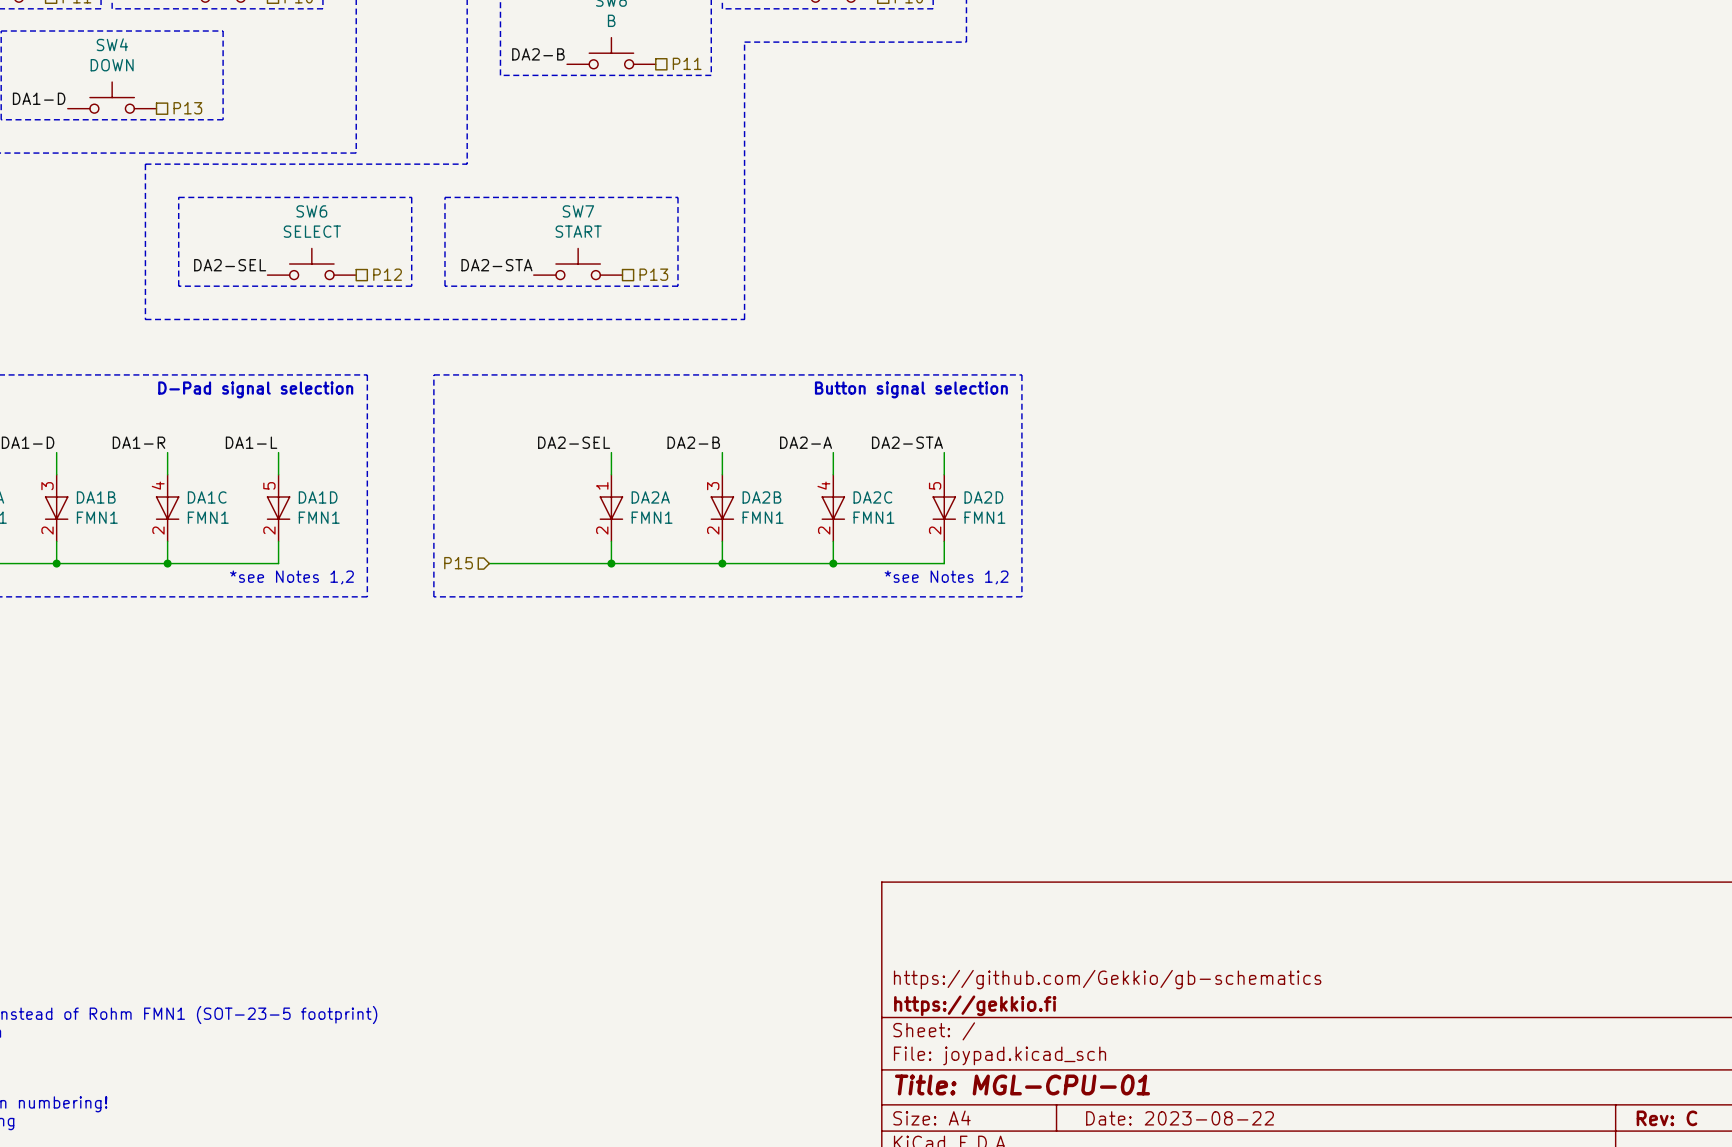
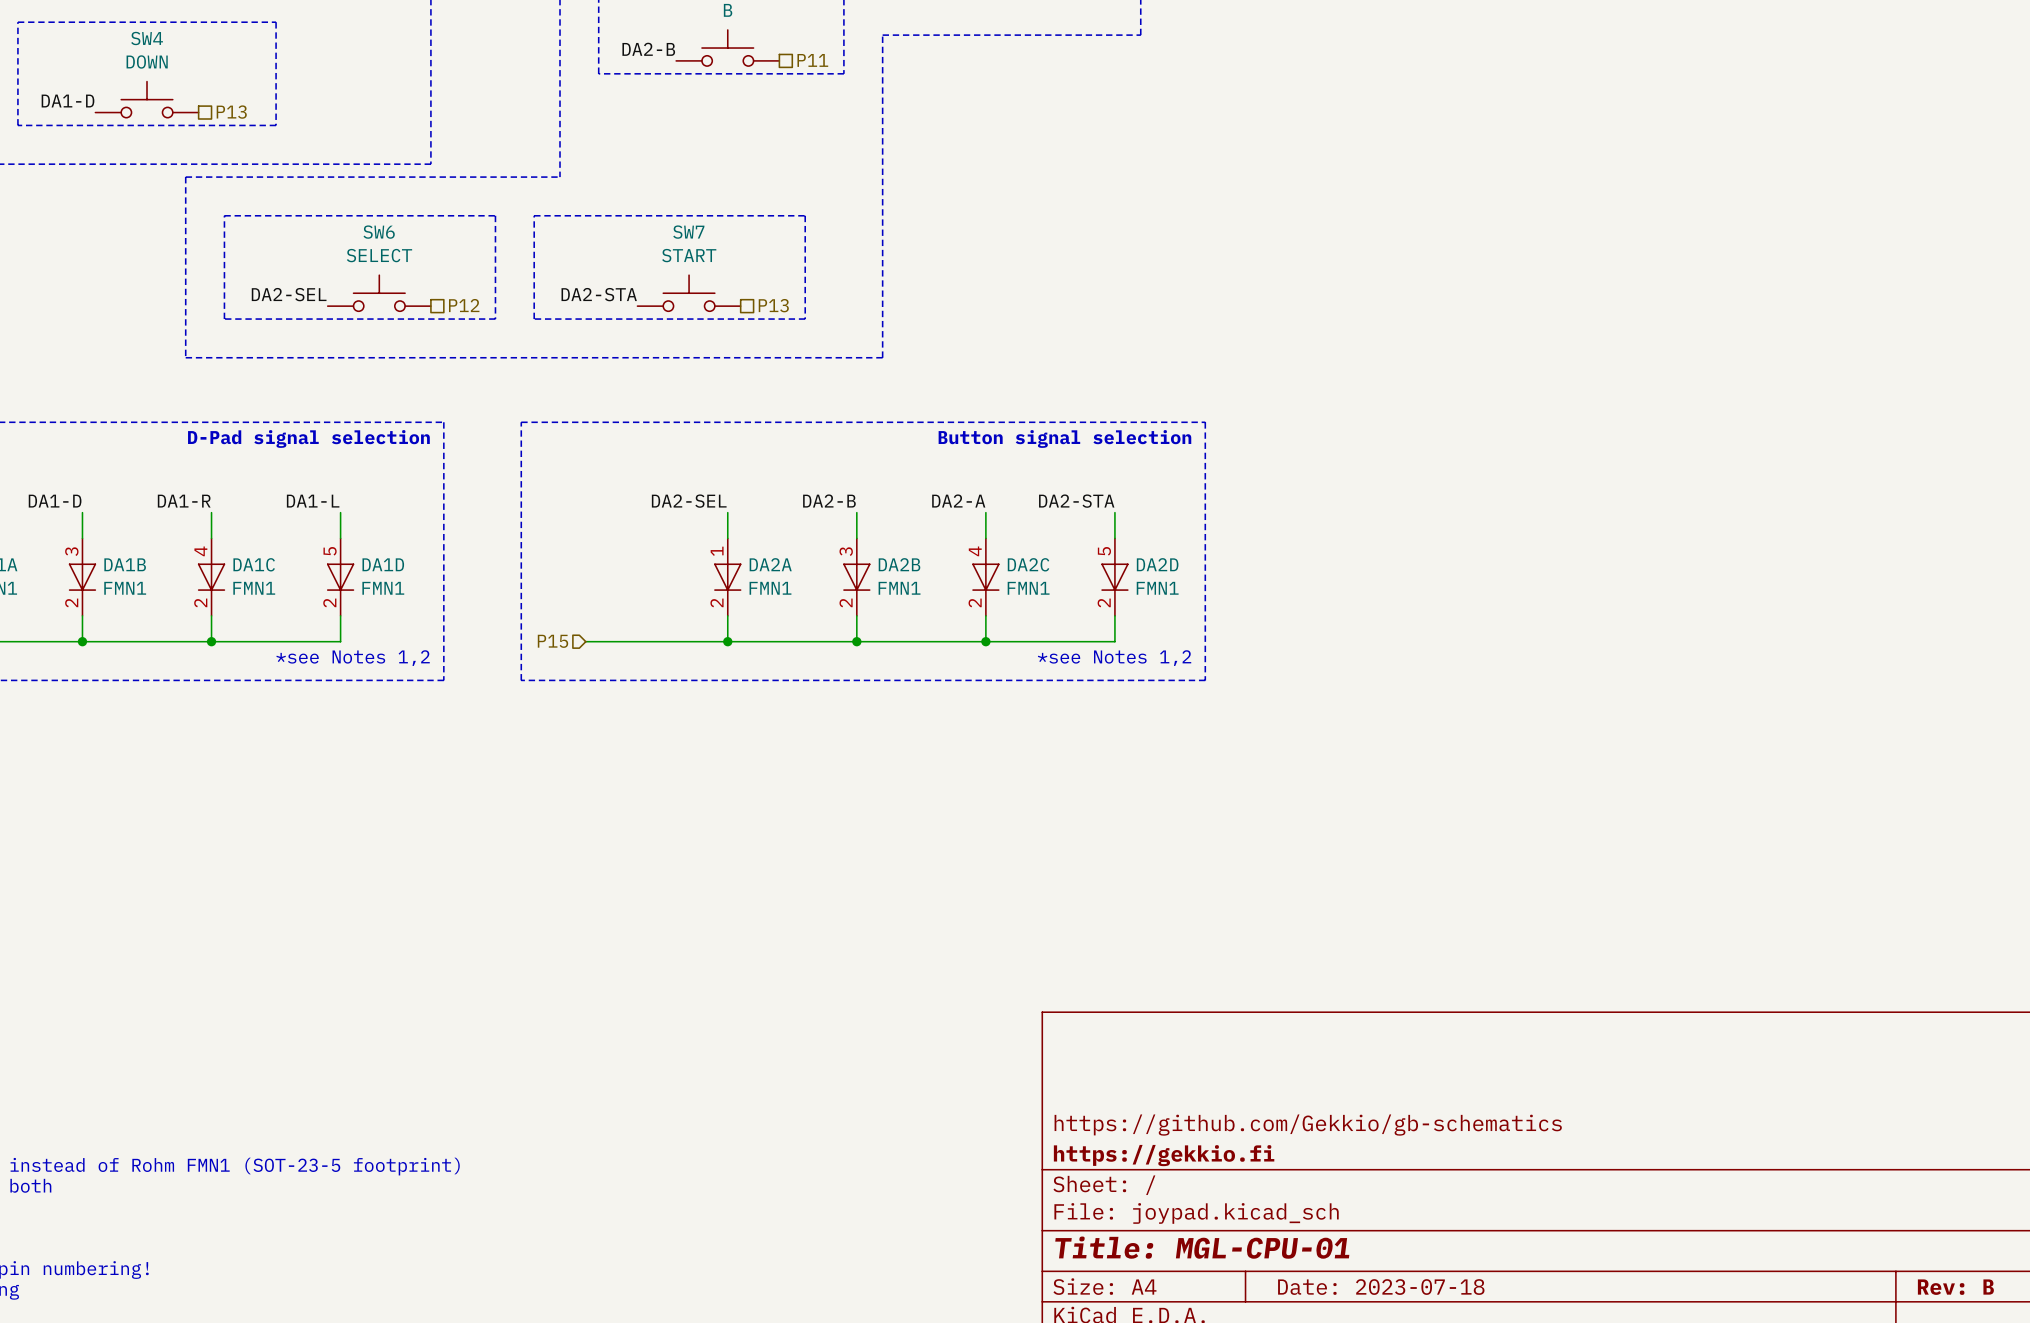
title block: Date: 2023-08-22 (1180, 1118) -> Date: 2023-07-18 (1381, 1287)
title block: Rev: C (1666, 1118) -> Rev: B (1955, 1287)

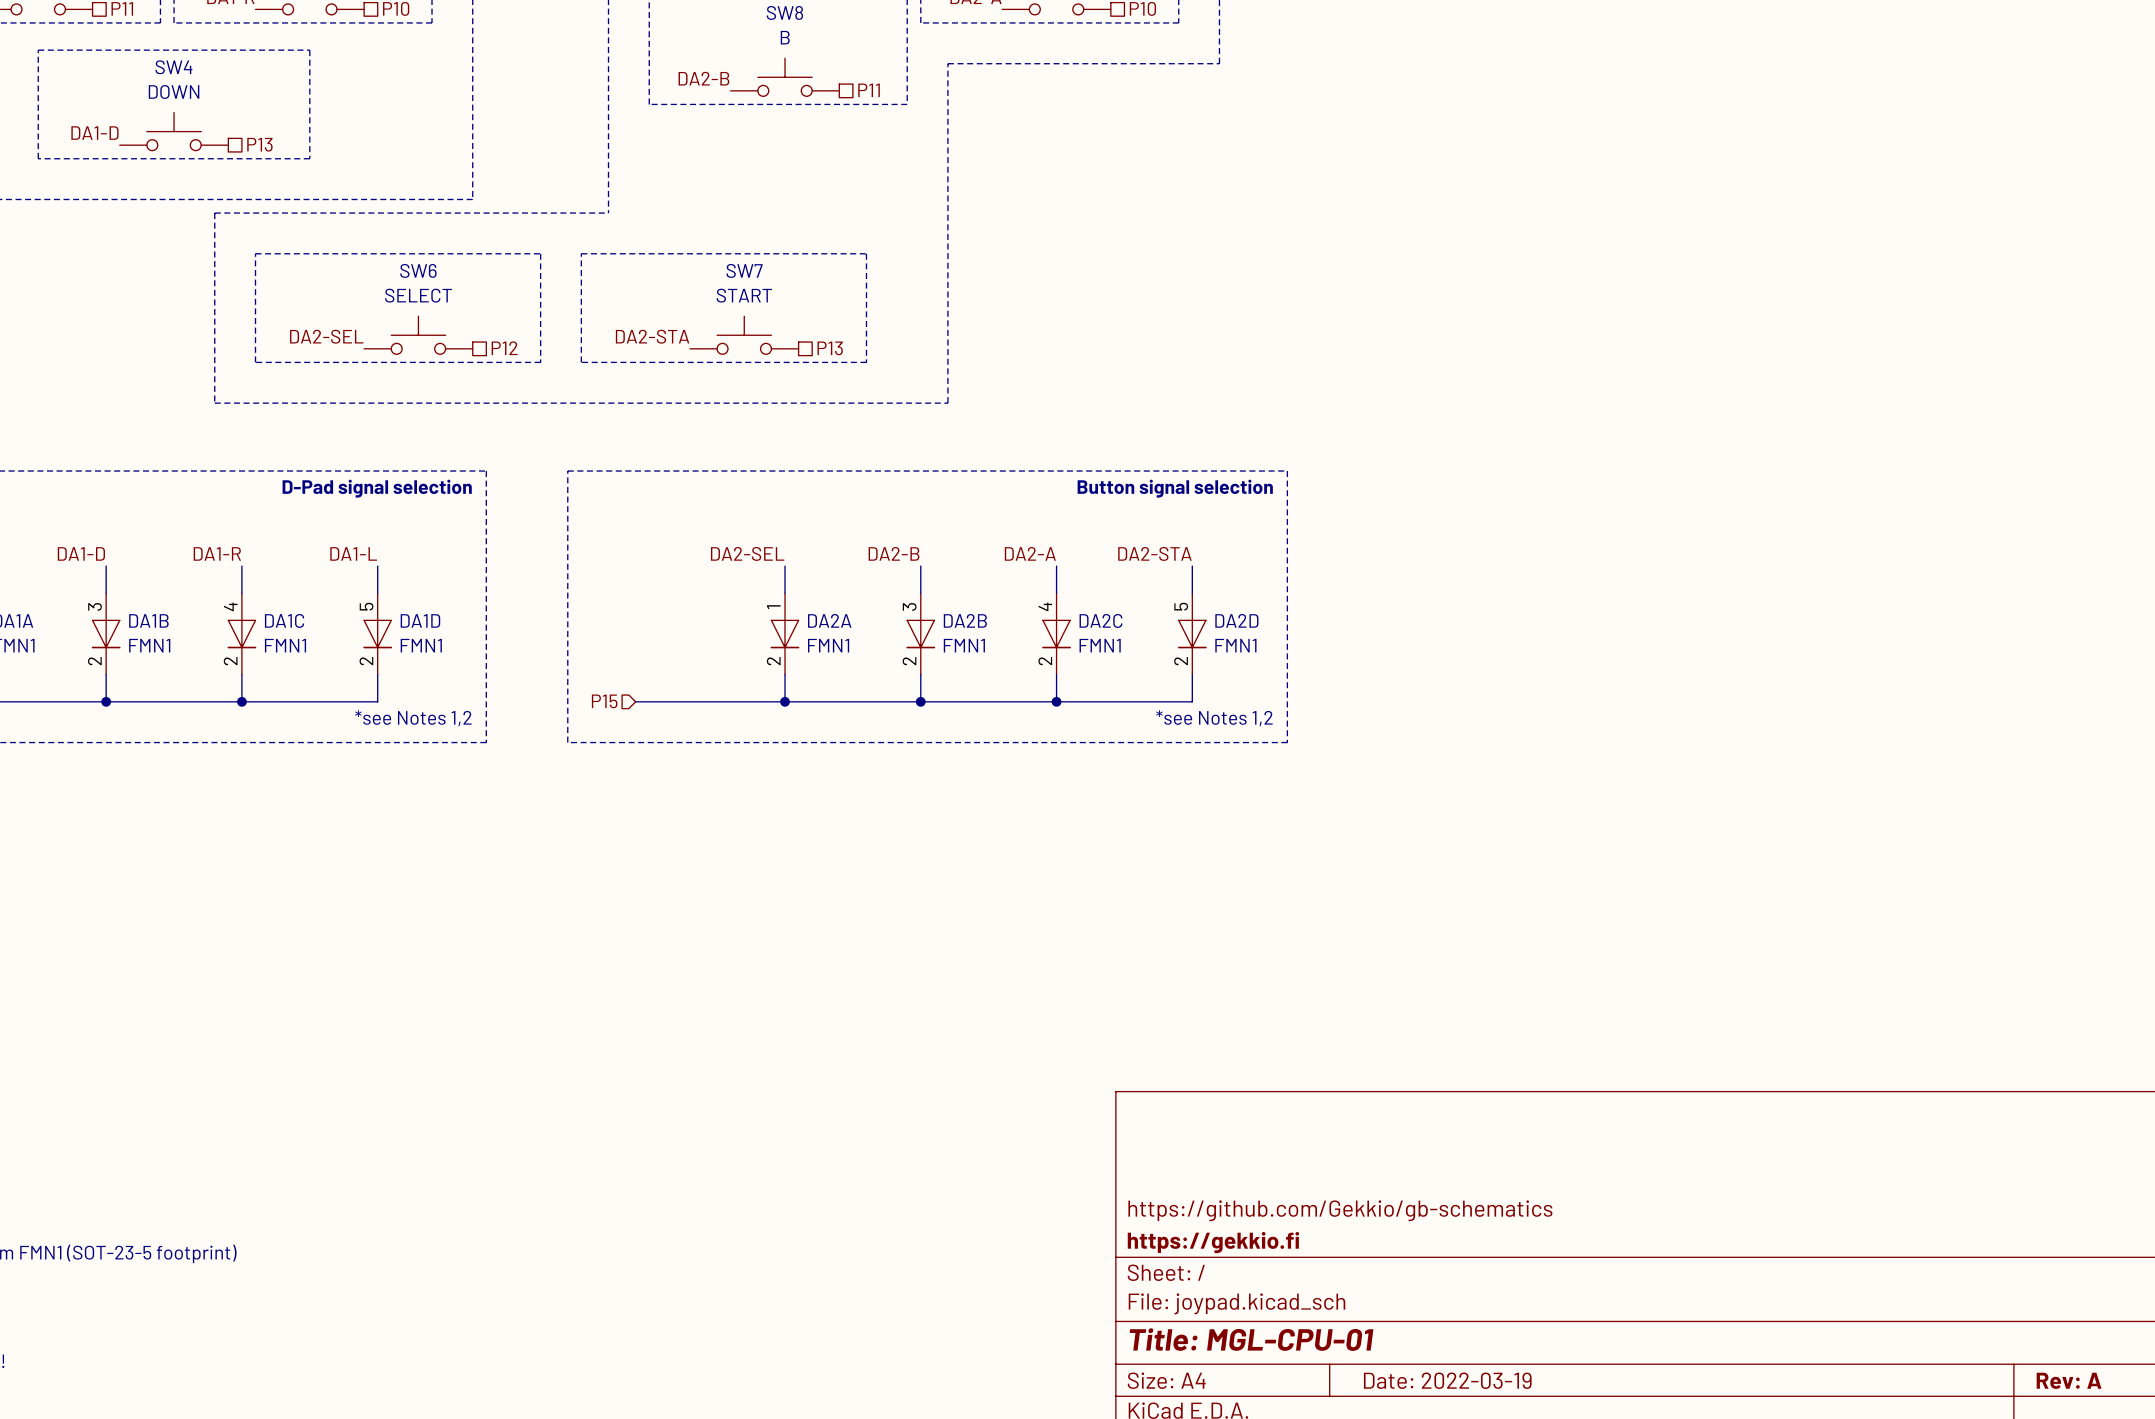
title block: Date: 2023-07-18 (1381, 1287) -> Date: 2022-03-19 (1447, 1380)
title block: Rev: B (1955, 1287) -> Rev: A (2069, 1380)

